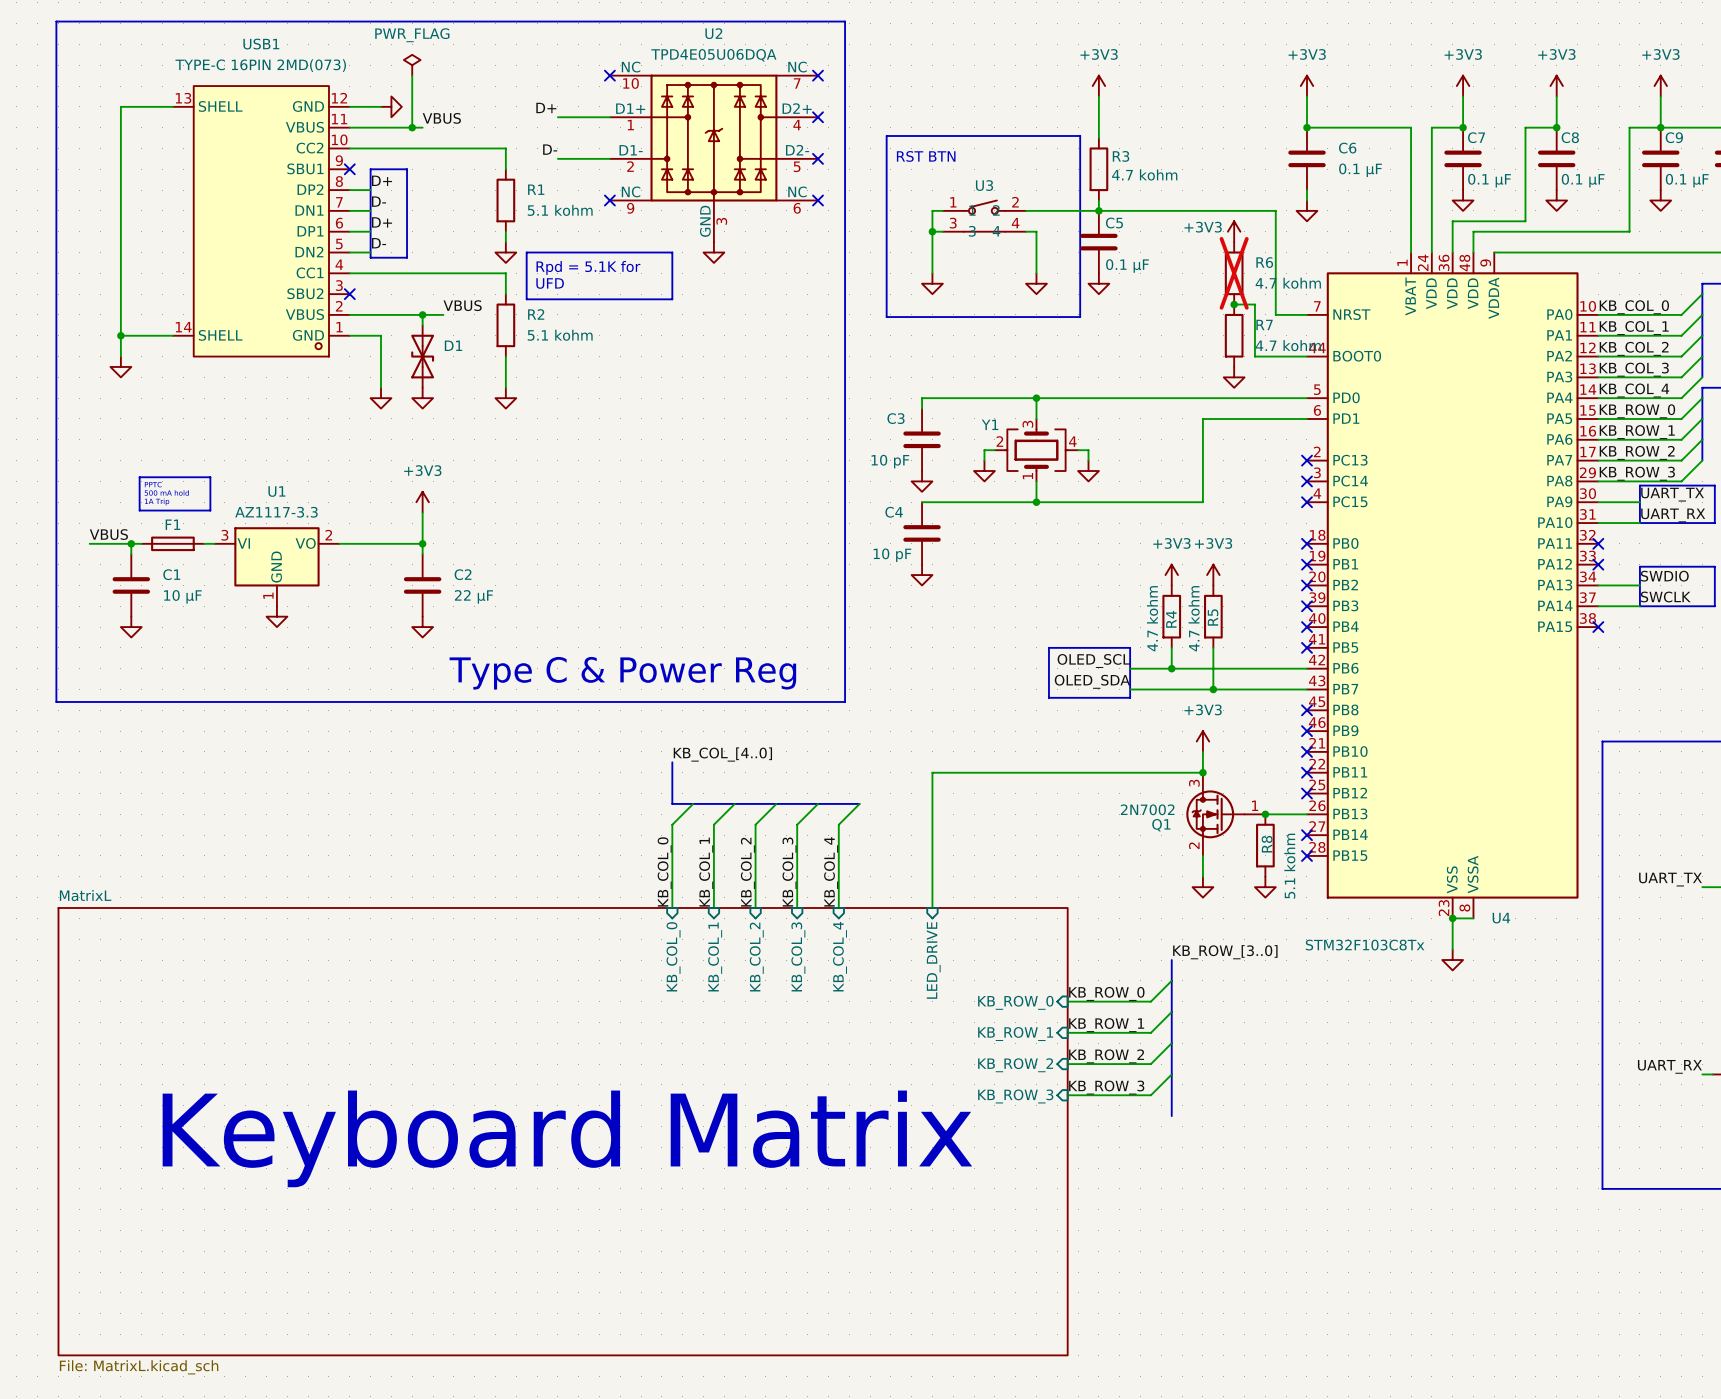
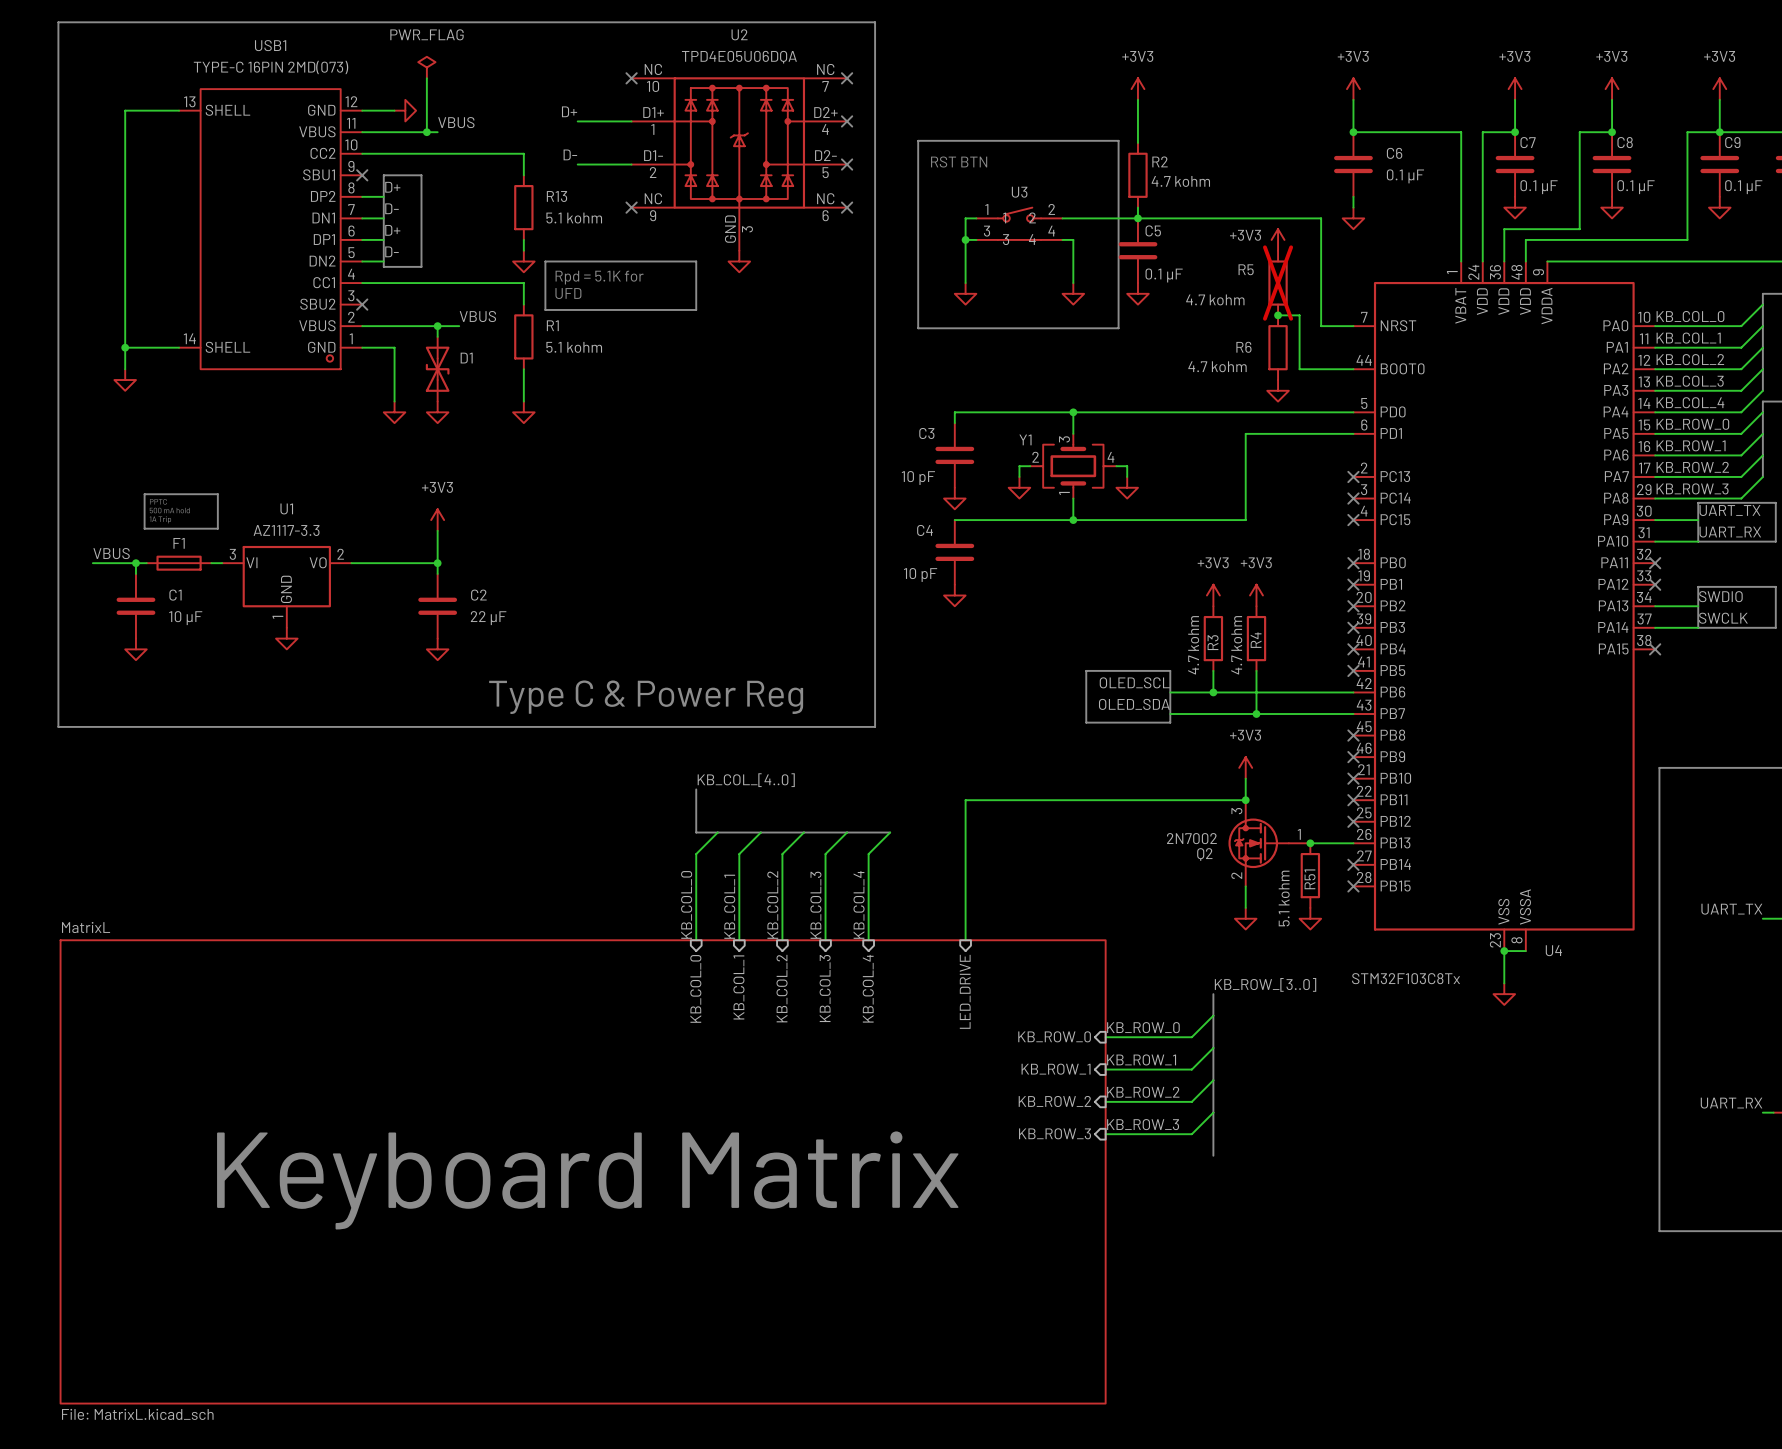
R3 name: R3 (1121, 156) -> R2 (1160, 161)
R1 name: R1 (536, 189) -> R13 (556, 196)
R6 name: R6 (1264, 262) -> R5 (1246, 269)
R6 value position: 4.7 kohm (1288, 283) -> 4.7 kohm (1215, 299)
R2 name: R2 (536, 314) -> R1 (552, 325)
R7 name: R7 (1264, 324) -> R6 (1243, 347)
R7 value position: 4.7 kohm (1288, 345) -> 4.7 kohm (1217, 366)
R5 name: R5 (1213, 617) -> R4 (1256, 640)
R4 name: R4 (1171, 619) -> R3 (1213, 642)
Q1 name: Q1 (1161, 825) -> Q2 (1204, 854)
R8 name: R8 (1267, 844) -> R51 (1310, 879)
R8 value position: 5.1 kohm (1289, 866) -> 5.1 kohm (1284, 898)

